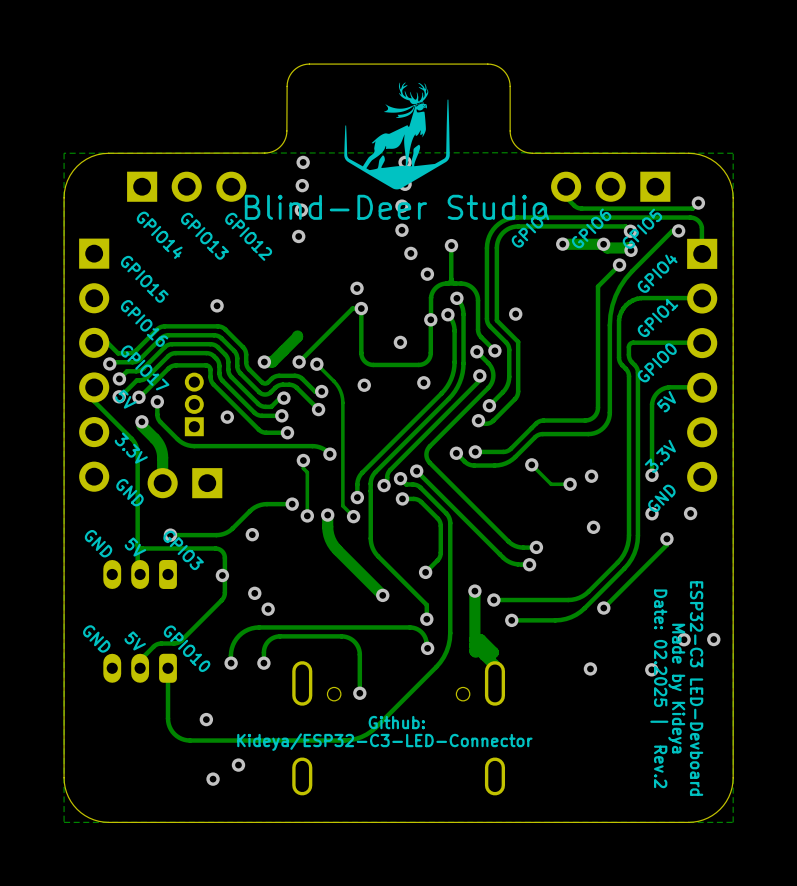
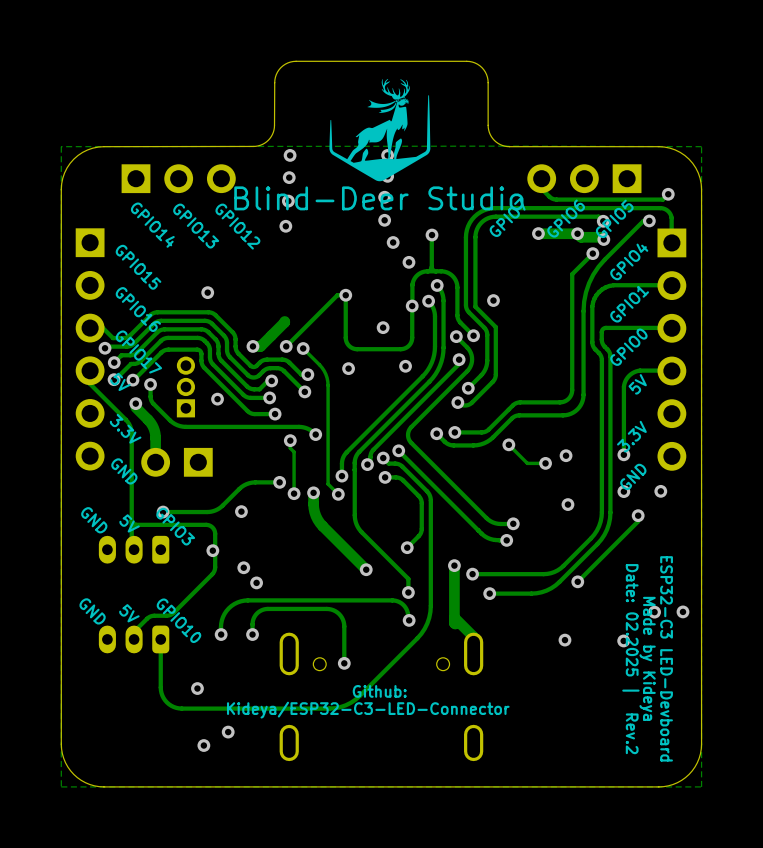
via: (357, 288) -> none
track: (474, 639) (480, 639) (493, 652) (490, 655) (484, 655) -> none

